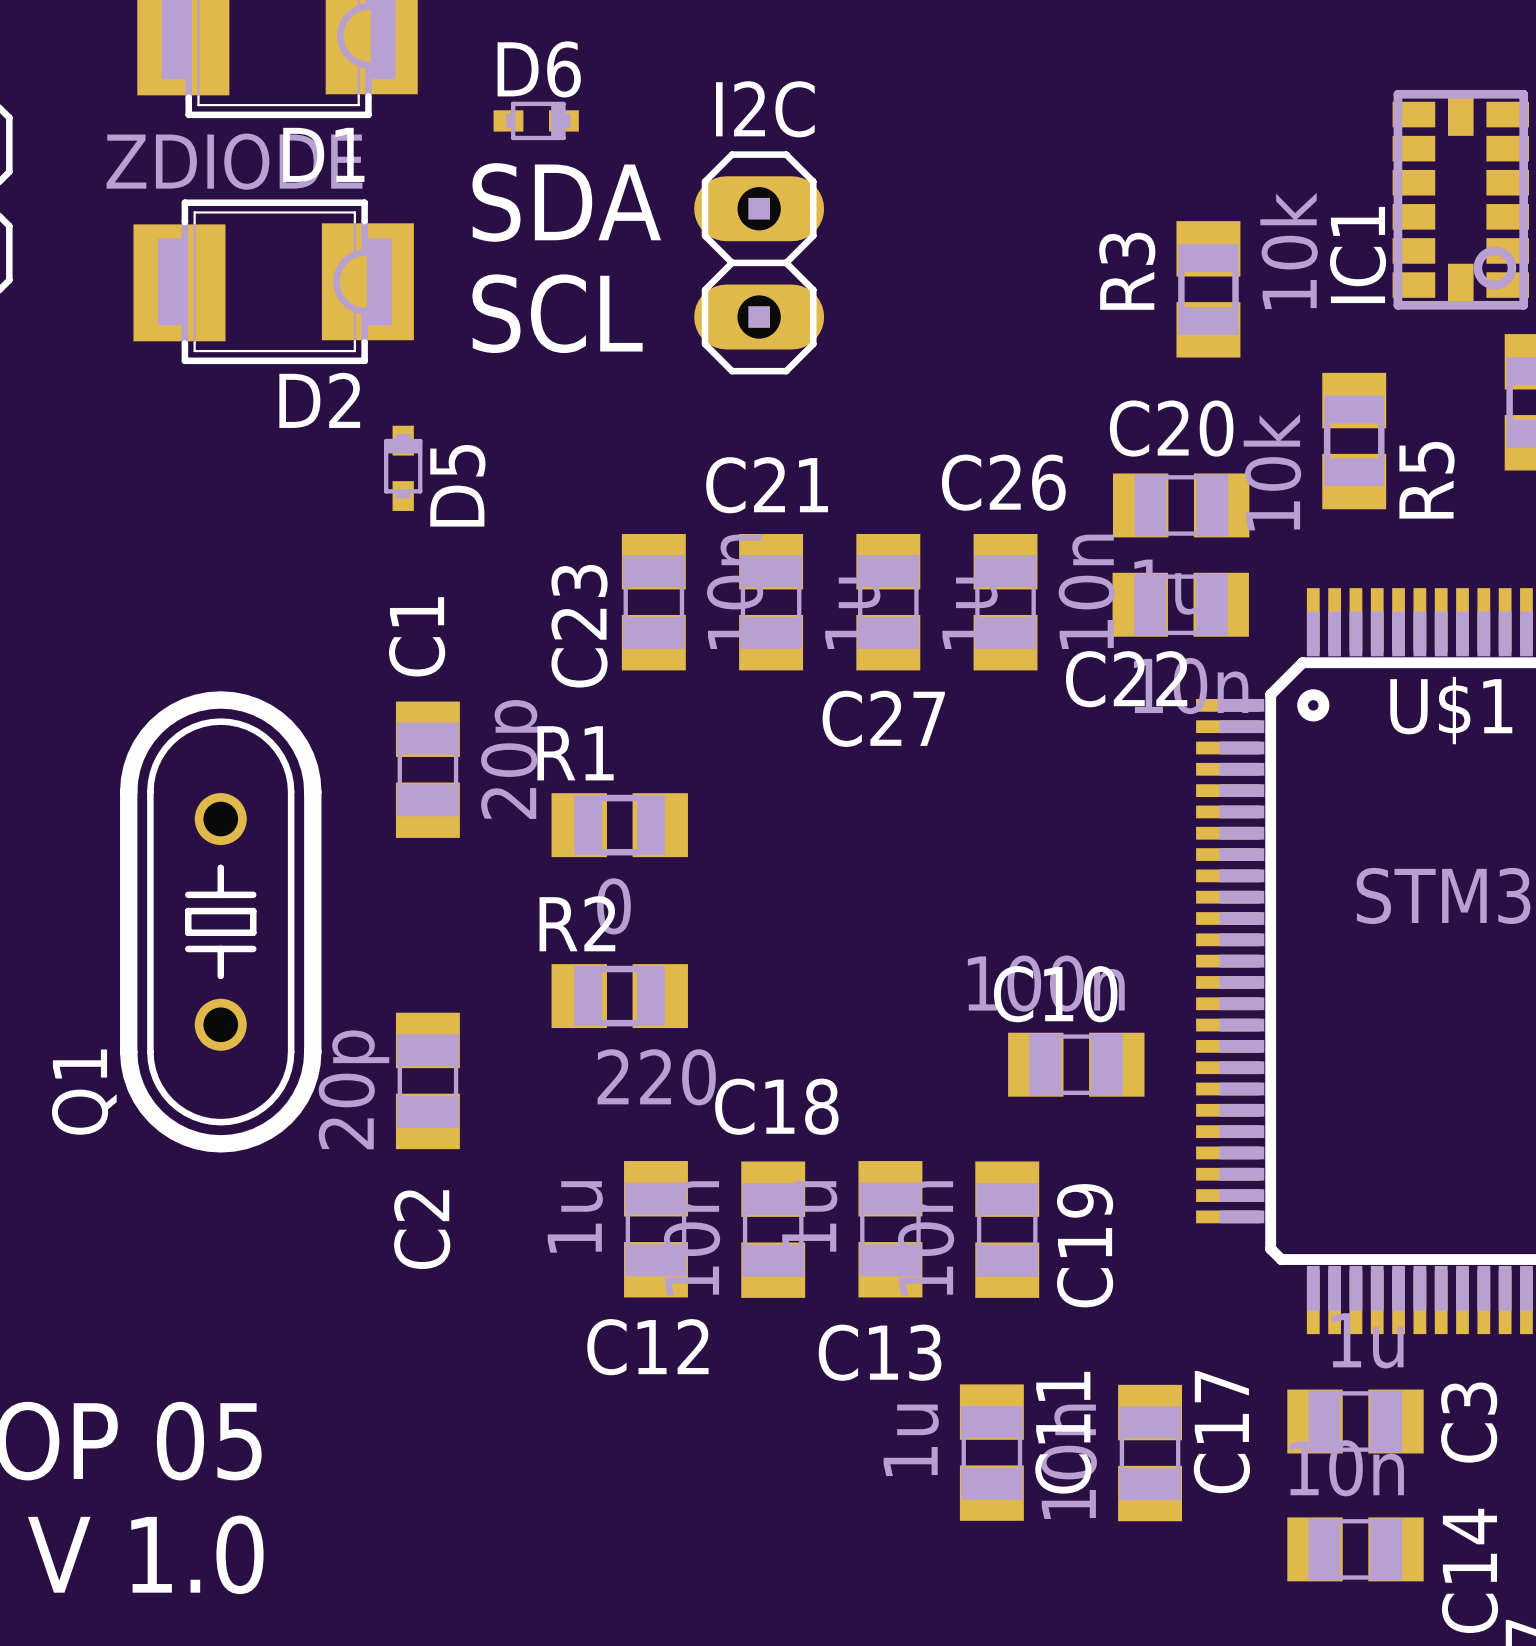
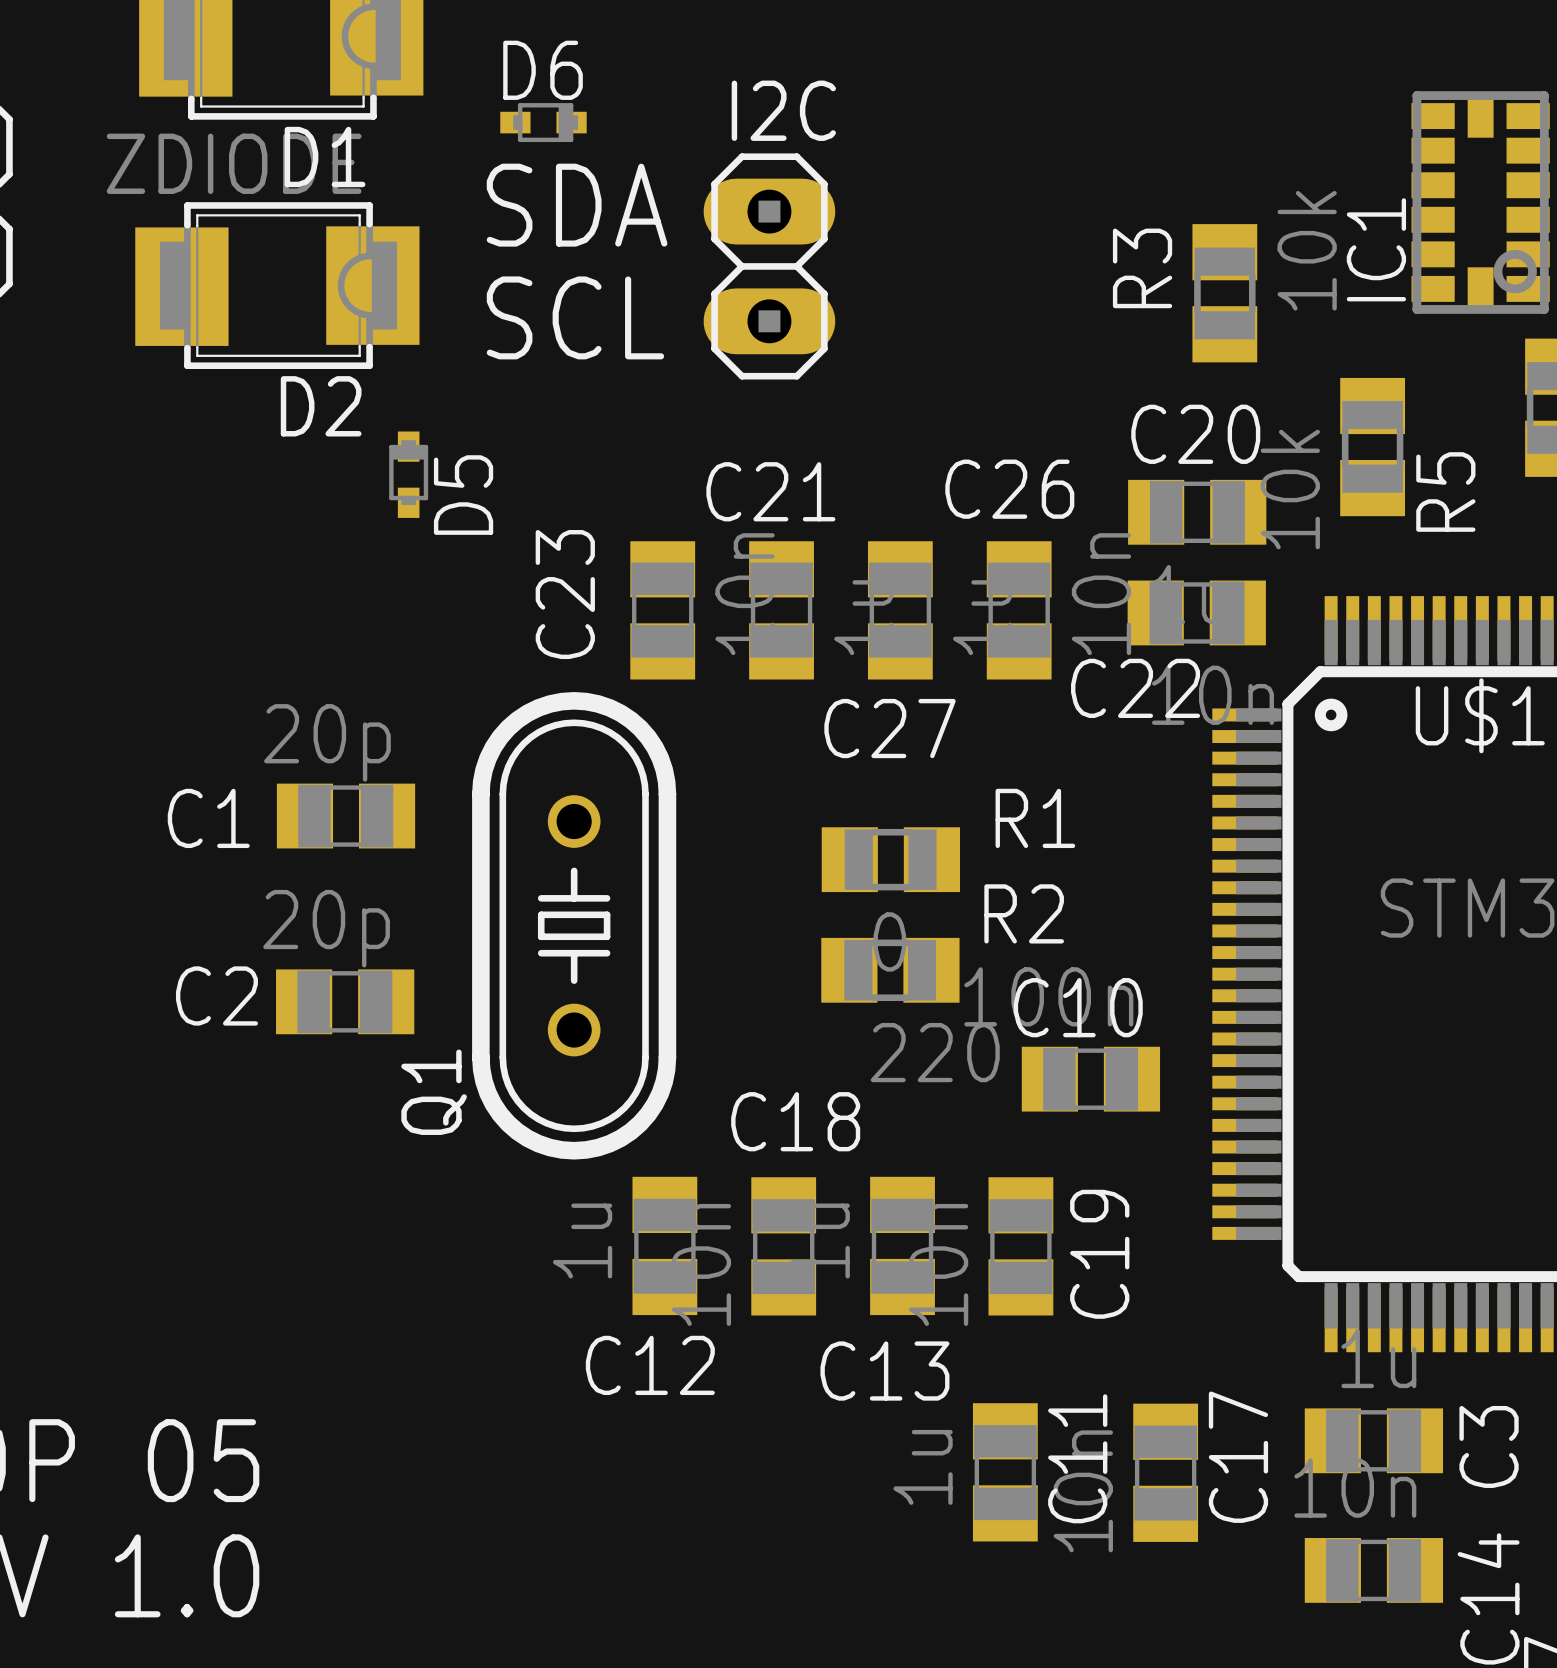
C23 name position: C23 (579, 626) -> C23 (565, 594)
C1 name position: C1 (417, 636) -> C1 (208, 818)
R1 name position: R1 (575, 753) -> R1 (1035, 818)
C1 value position: 20p (516, 759) -> 20p (327, 742)
C1 rotation: 0° (427, 769) -> 90° clockwise (346, 816)
C1 position: (427, 769) -> (346, 816)
R1 position: (619, 825) -> (890, 859)
Q1 position: (220, 921) -> (574, 925)
R2 name position: R2 (577, 923) -> R2 (1024, 913)
R2 position: (619, 996) -> (890, 970)
C2 rotation: 0° (427, 1080) -> 90° clockwise (345, 1001)
C2 position: (427, 1080) -> (345, 1001)

